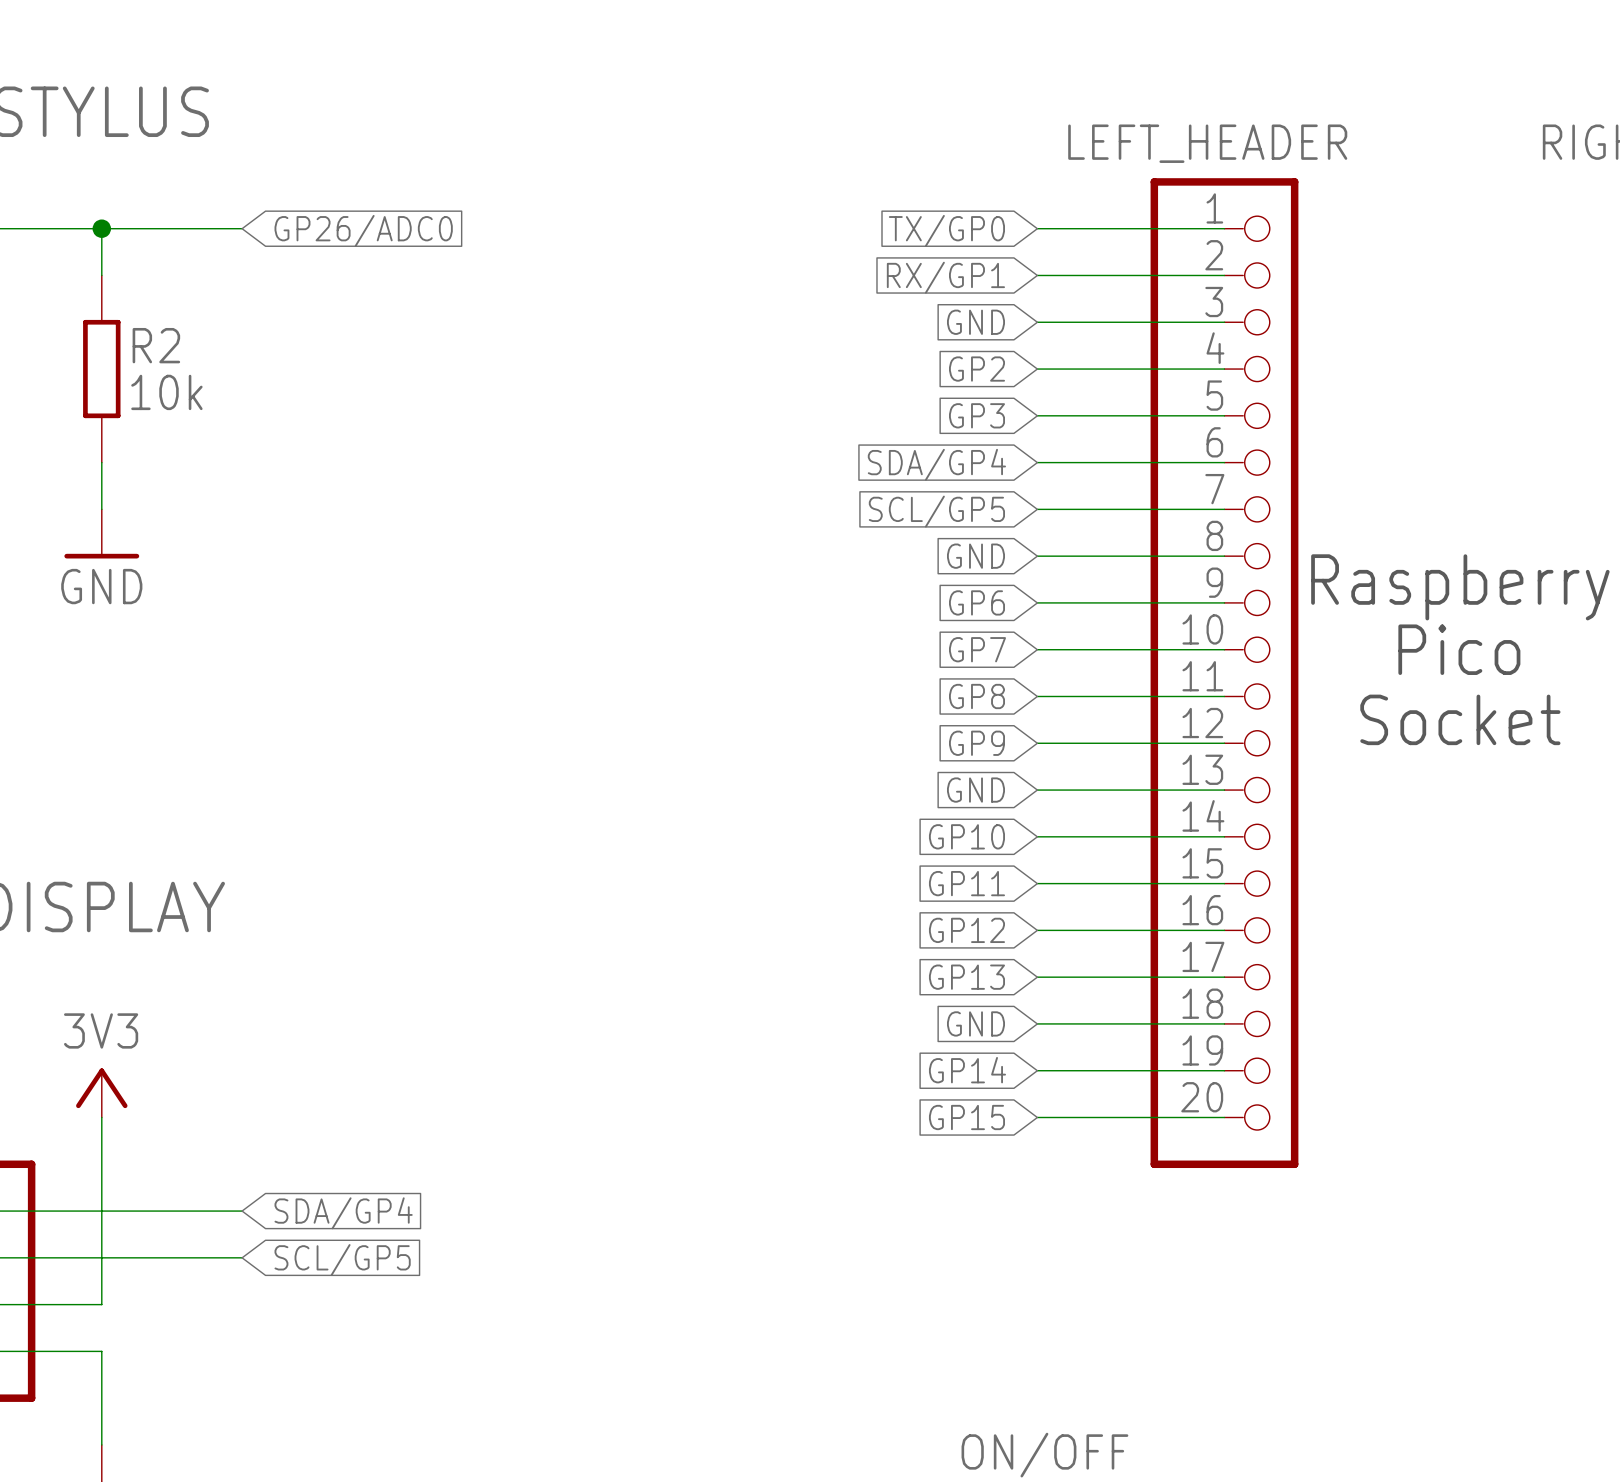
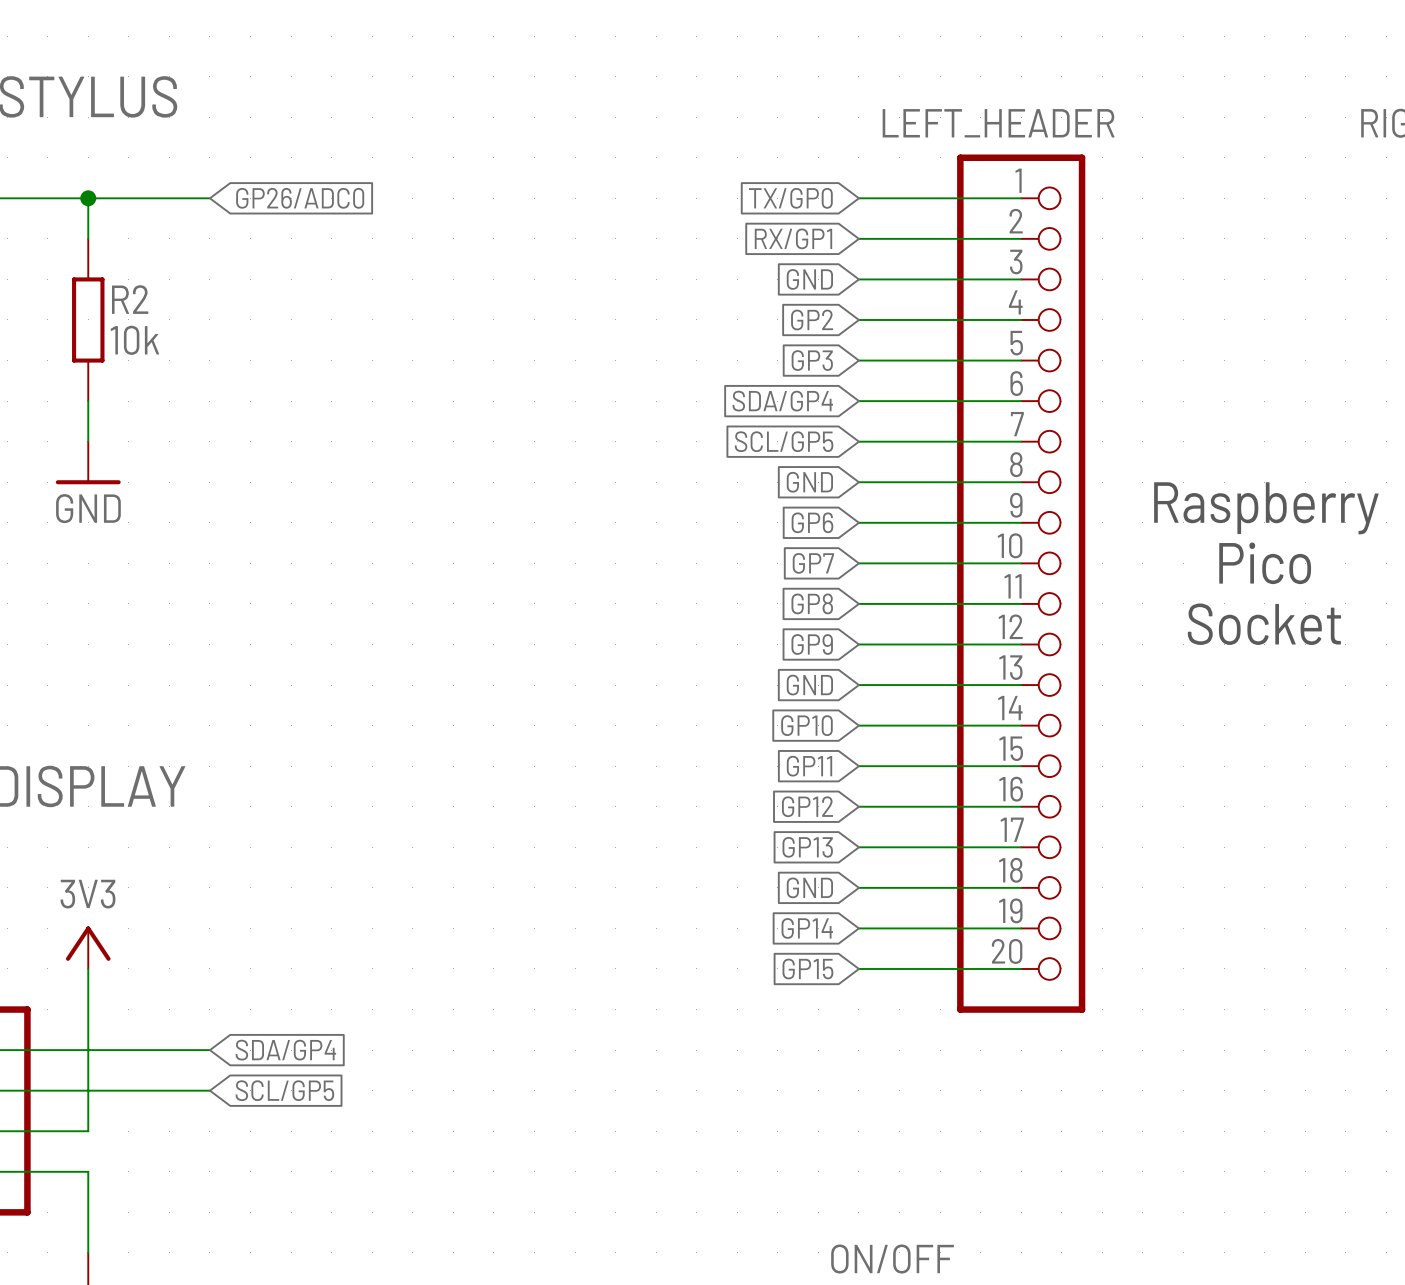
wire: (1177, 228) (1224, 228) -> (858, 198) (899, 198)
global label position: TX/GP0 (946, 230) -> TX/GP0 (790, 198)
wire: (1177, 275) (1224, 275) -> (858, 238) (899, 238)
global label position: RX/GP1 (945, 277) -> RX/GP1 (793, 238)
global label position: GND (975, 322) -> GND (809, 279)
wire: (1177, 322) (1224, 322) -> (858, 279) (899, 279)
global label position: GP2 (977, 369) -> GP2 (812, 319)
wire: (1177, 369) (1224, 369) -> (858, 319) (899, 319)
global label position: GP3 (977, 415) -> GP3 (812, 360)
wire: (1177, 415) (1224, 415) -> (858, 360) (899, 360)
wire: (1177, 462) (1224, 462) -> (858, 401) (899, 401)
global label position: SDA/GP4 (936, 464) -> SDA/GP4 (782, 401)
wire: (1177, 509) (1224, 509) -> (858, 441) (899, 441)
global label position: SCL/GP5 (936, 511) -> SCL/GP5 (784, 441)
global label position: GND (975, 556) -> GND (809, 482)
wire: (1177, 556) (1224, 556) -> (858, 482) (899, 482)
global label position: GP6 (977, 602) -> GP6 (812, 522)
wire: (1177, 602) (1224, 602) -> (858, 522) (899, 522)
global label position: GP7 (977, 649) -> GP7 (813, 563)
wire: (1177, 649) (1224, 649) -> (858, 563) (899, 563)
LEFT_HEADER position: (1224, 673) -> (1021, 583)
global label position: GP8 (977, 696) -> GP8 (812, 603)
wire: (1177, 696) (1224, 696) -> (858, 603) (899, 603)
global label position: GP9 (977, 743) -> GP9 (812, 644)
wire: (1177, 743) (1224, 743) -> (858, 644) (899, 644)
global label position: GND (975, 790) -> GND (809, 685)
wire: (1177, 790) (1224, 790) -> (858, 685) (899, 685)
global label position: GP10 (966, 836) -> GP10 (806, 725)
wire: (1177, 836) (1224, 836) -> (858, 725) (899, 725)
global label position: GP11 (966, 883) -> GP11 (809, 766)
wire: (1177, 883) (1224, 883) -> (858, 766) (899, 766)
global label position: GP12 (966, 930) -> GP12 (807, 806)
wire: (1177, 930) (1224, 930) -> (858, 806) (899, 806)
global label position: GP13 (966, 977) -> GP13 (807, 847)
wire: (1177, 977) (1224, 977) -> (858, 847) (899, 847)
global label position: GND (975, 1023) -> GND (809, 887)
wire: (1177, 1023) (1224, 1023) -> (858, 887) (899, 887)
global label position: GP14 (967, 1070) -> GP14 (807, 928)
wire: (1177, 1070) (1224, 1070) -> (858, 928) (899, 928)
global label position: GP15 (966, 1117) -> GP15 (807, 968)
wire: (1177, 1117) (1224, 1117) -> (858, 968) (899, 968)

